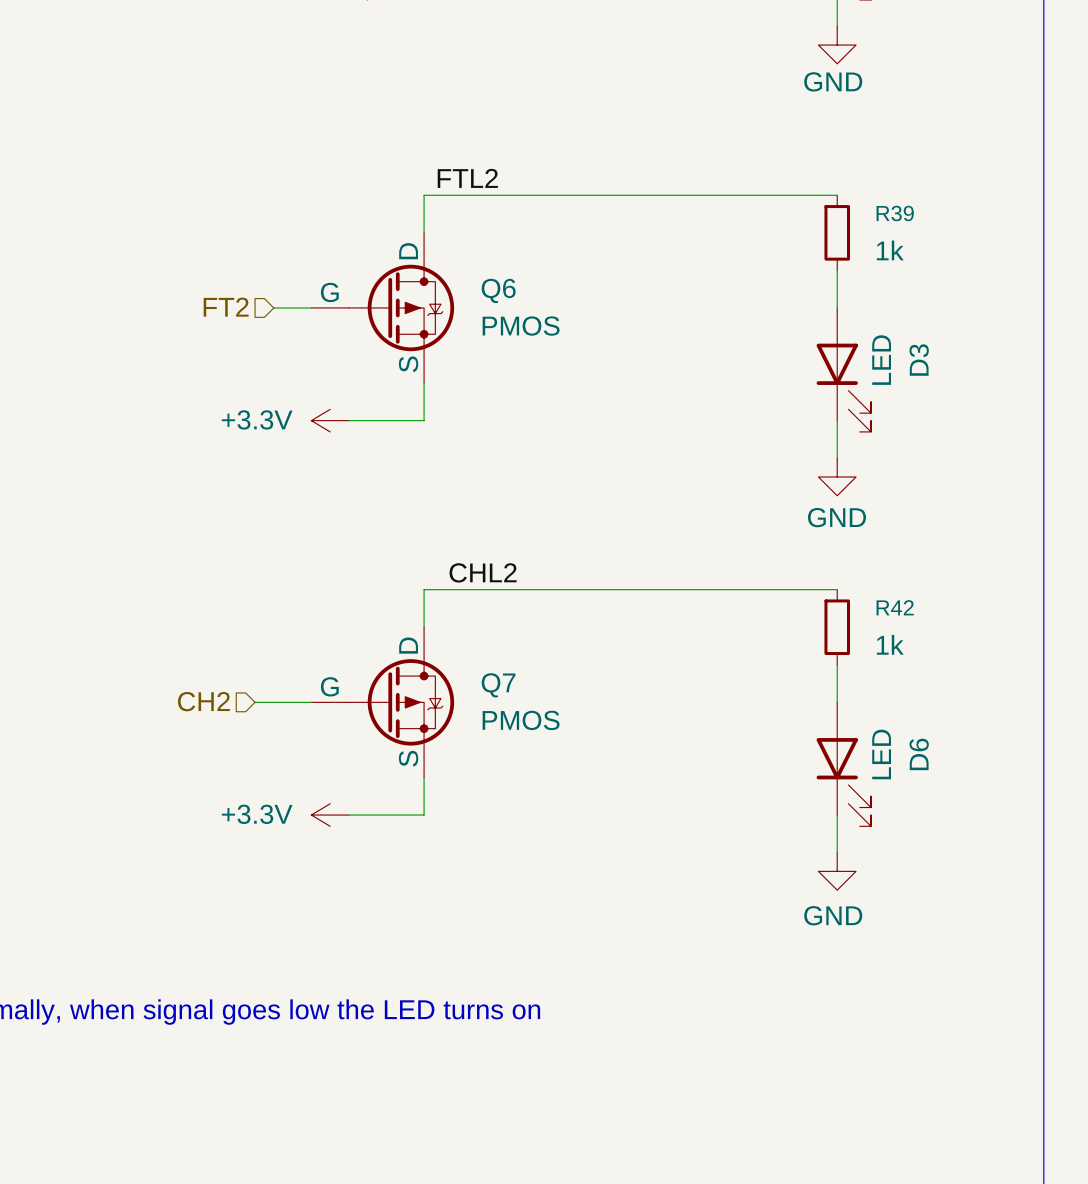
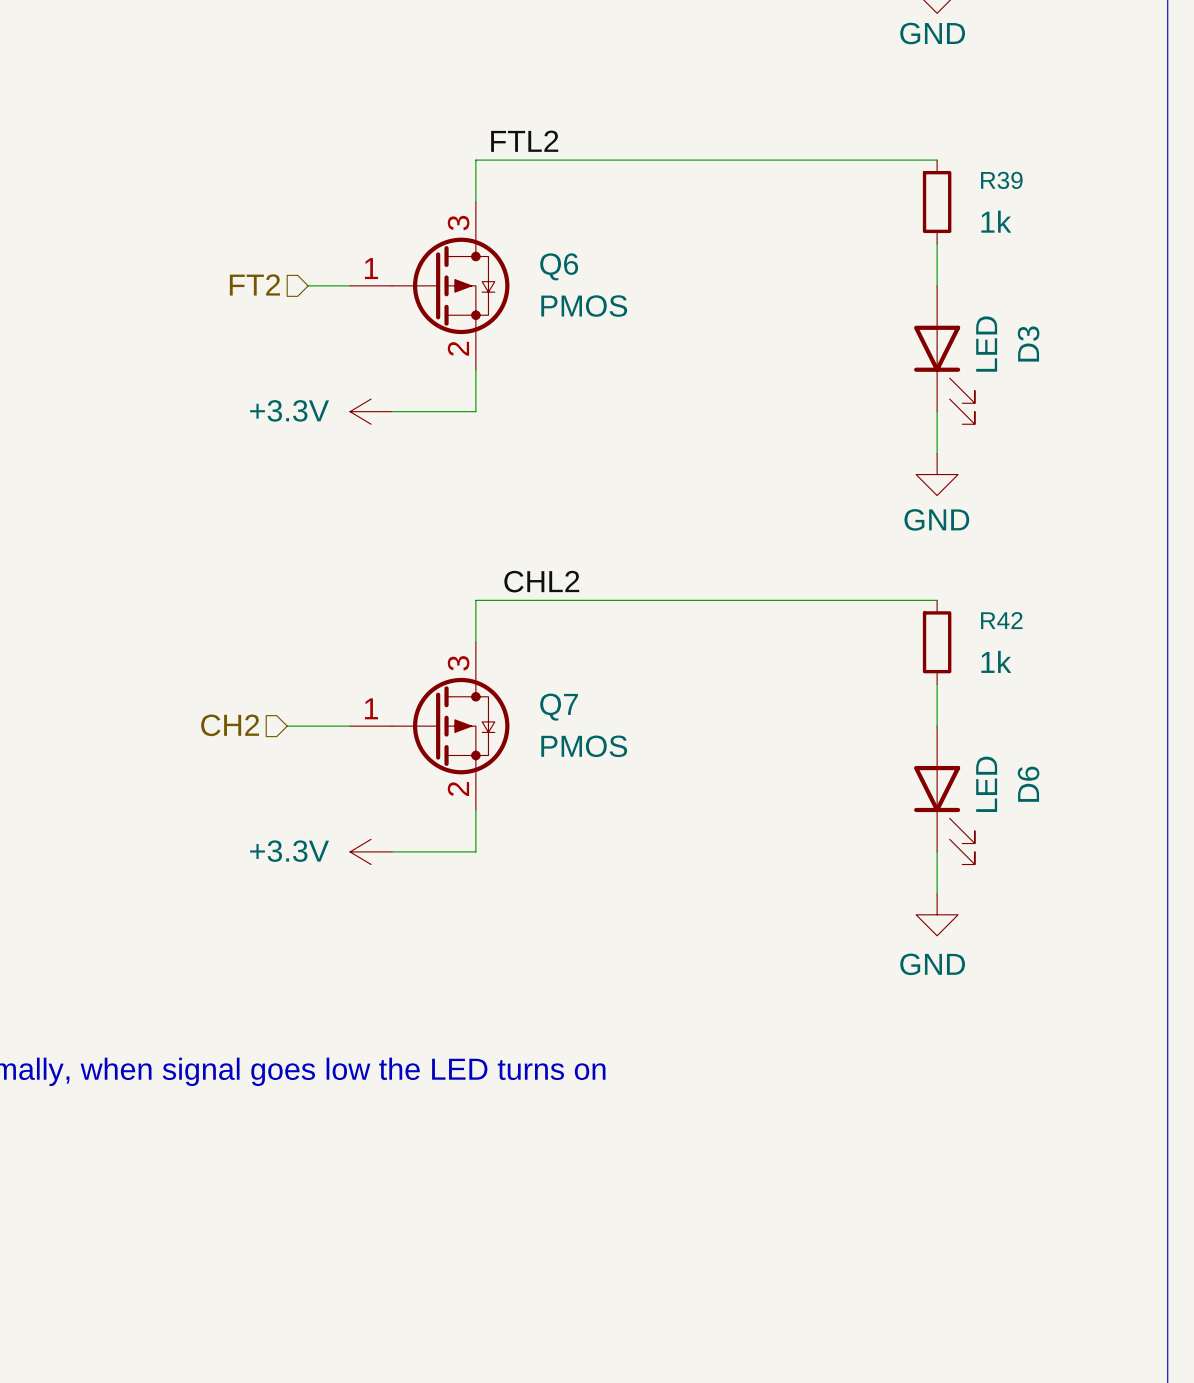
Q6 symbol: [311, 232, 455, 384] -> [350, 202, 510, 370]
Q7 symbol: [311, 627, 455, 778] -> [350, 642, 510, 810]

